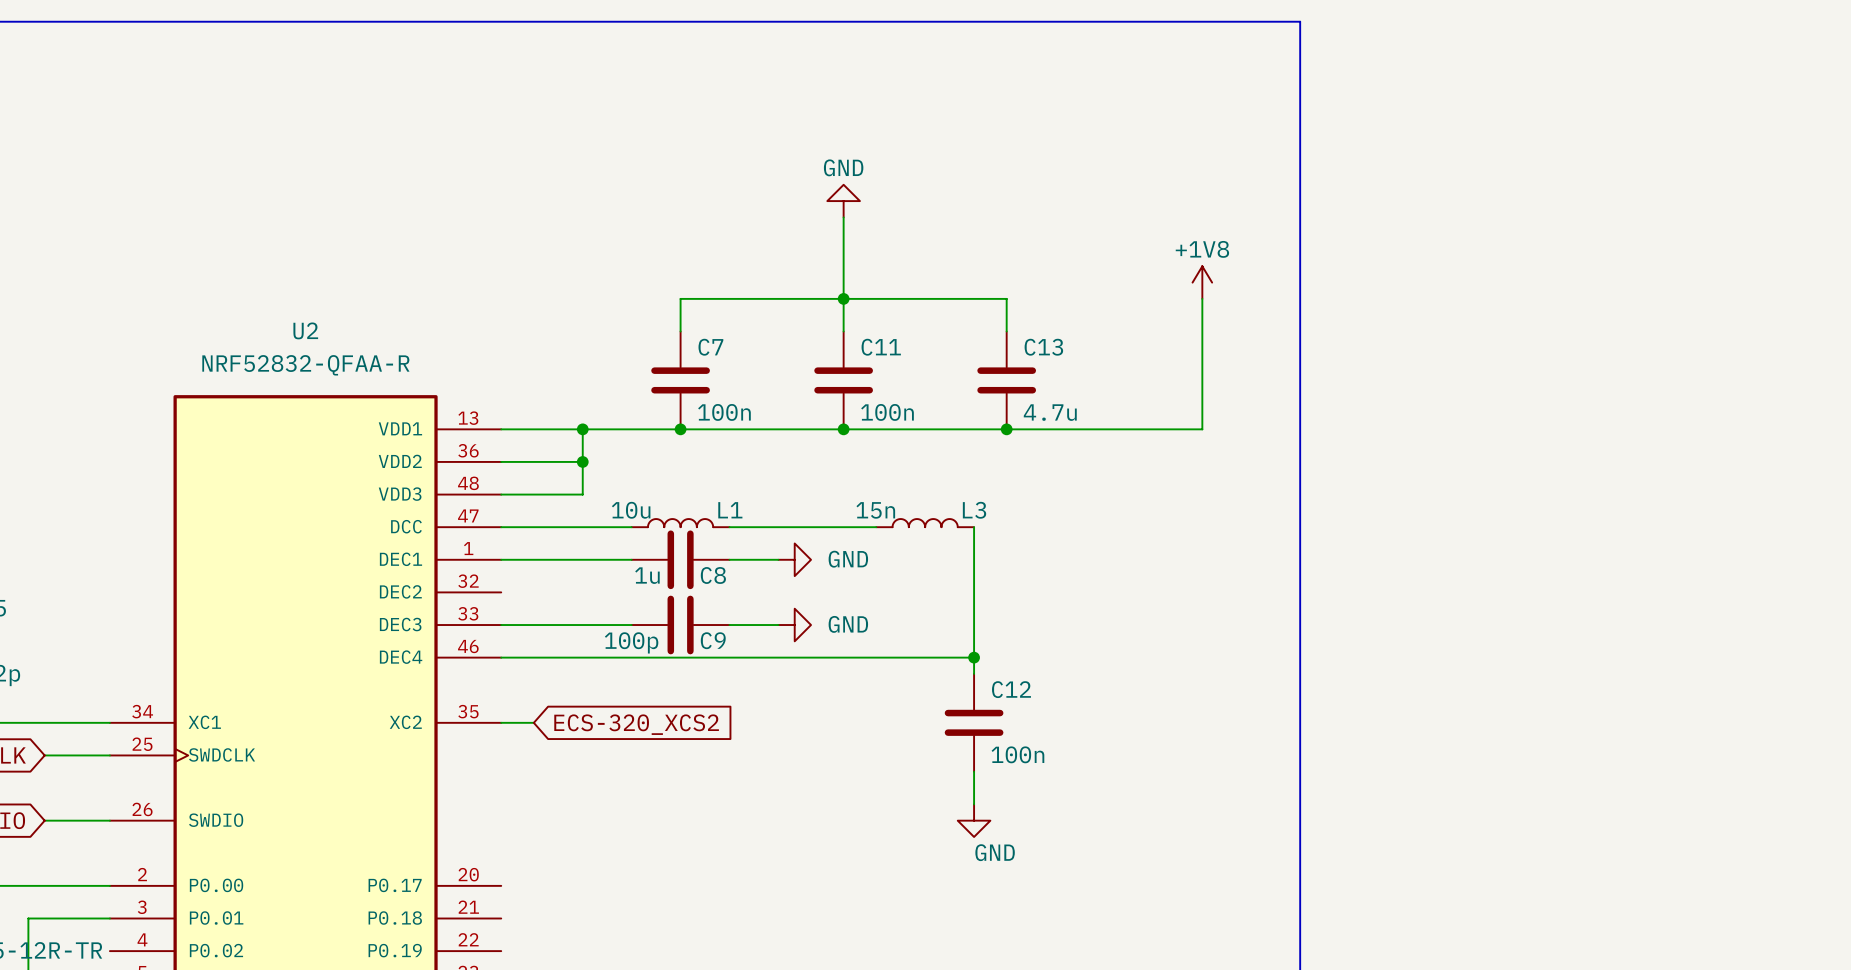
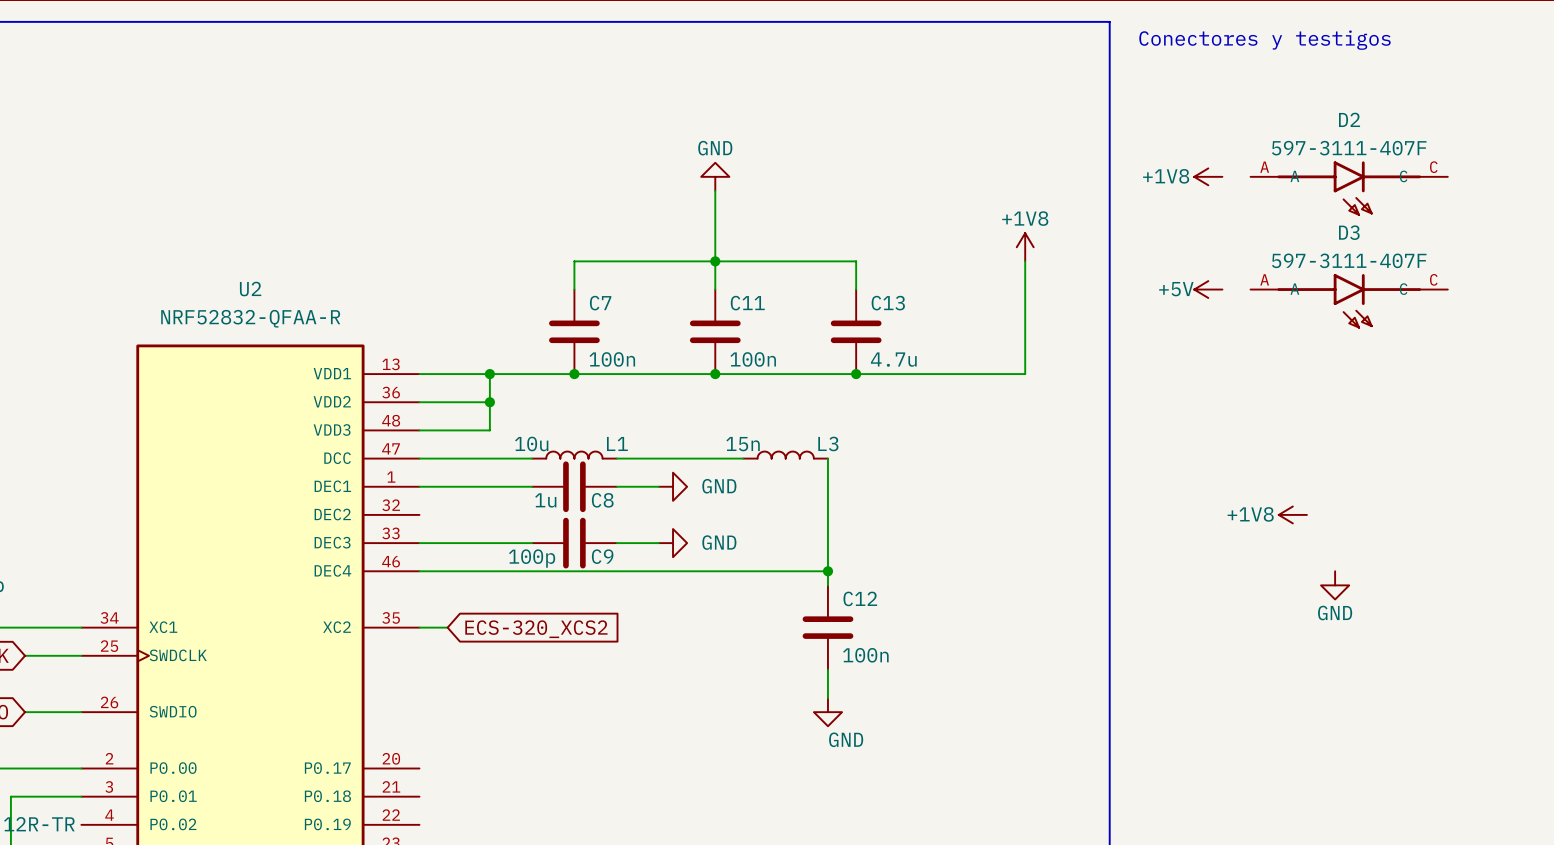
text: none -> Conectores y testigos (1264, 40)
power symbol: none -> +1V8 (1208, 176)
D2: none -> 597-3111-407F (1349, 188)
power symbol: none -> +5V (1208, 289)
D3: none -> 597-3111-407F (1349, 301)
power symbol: none -> +1V8 (1292, 514)
power symbol: none -> GND (1335, 585)

